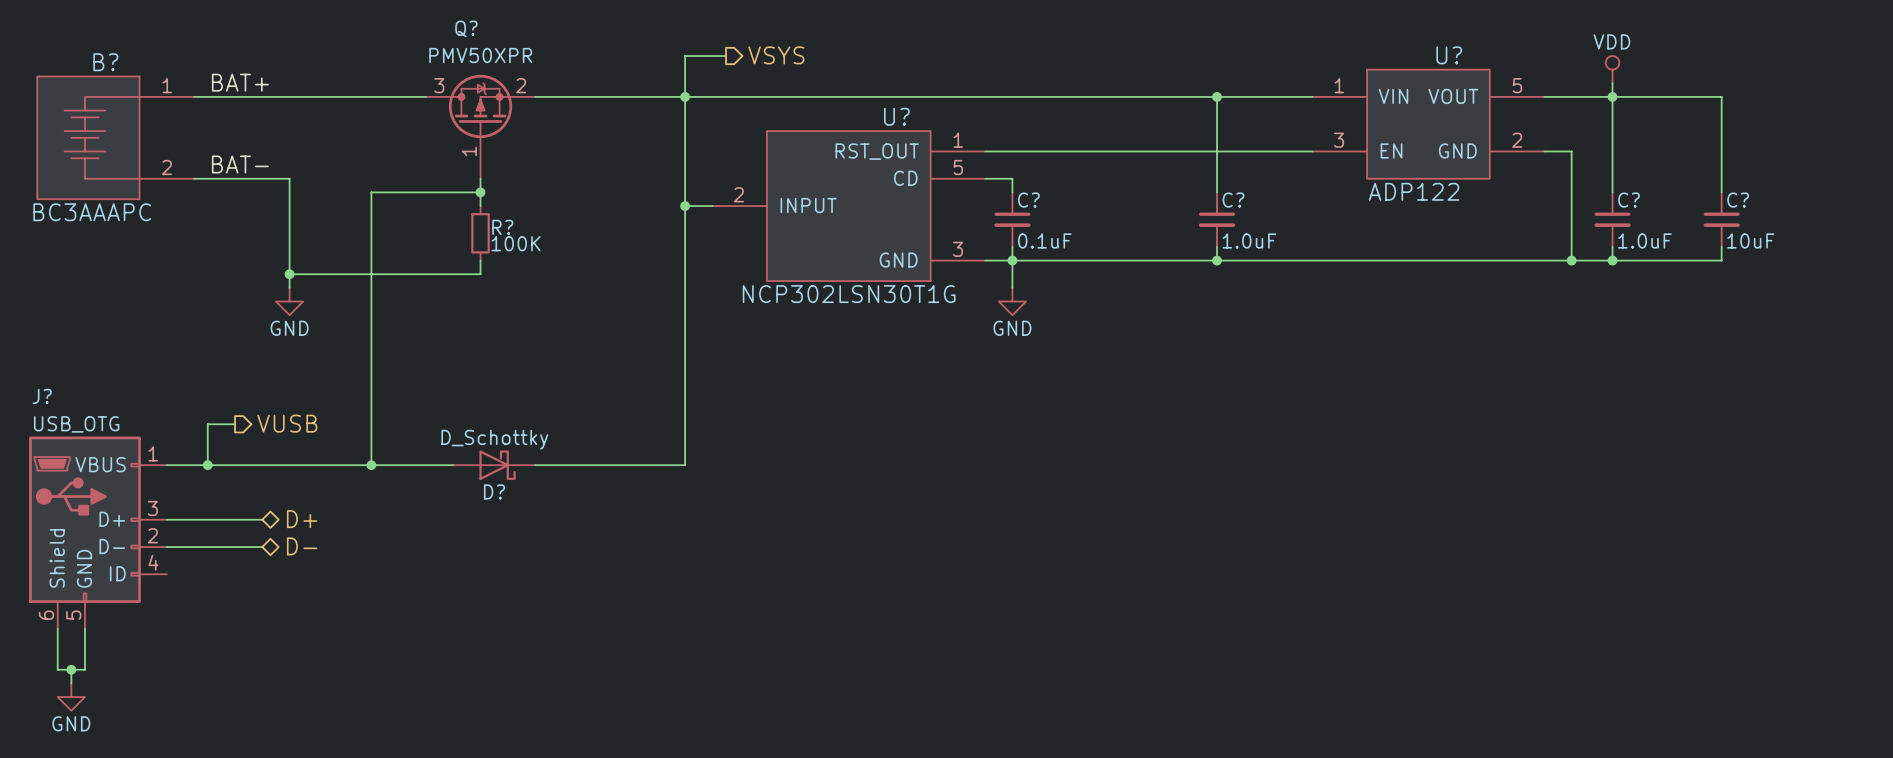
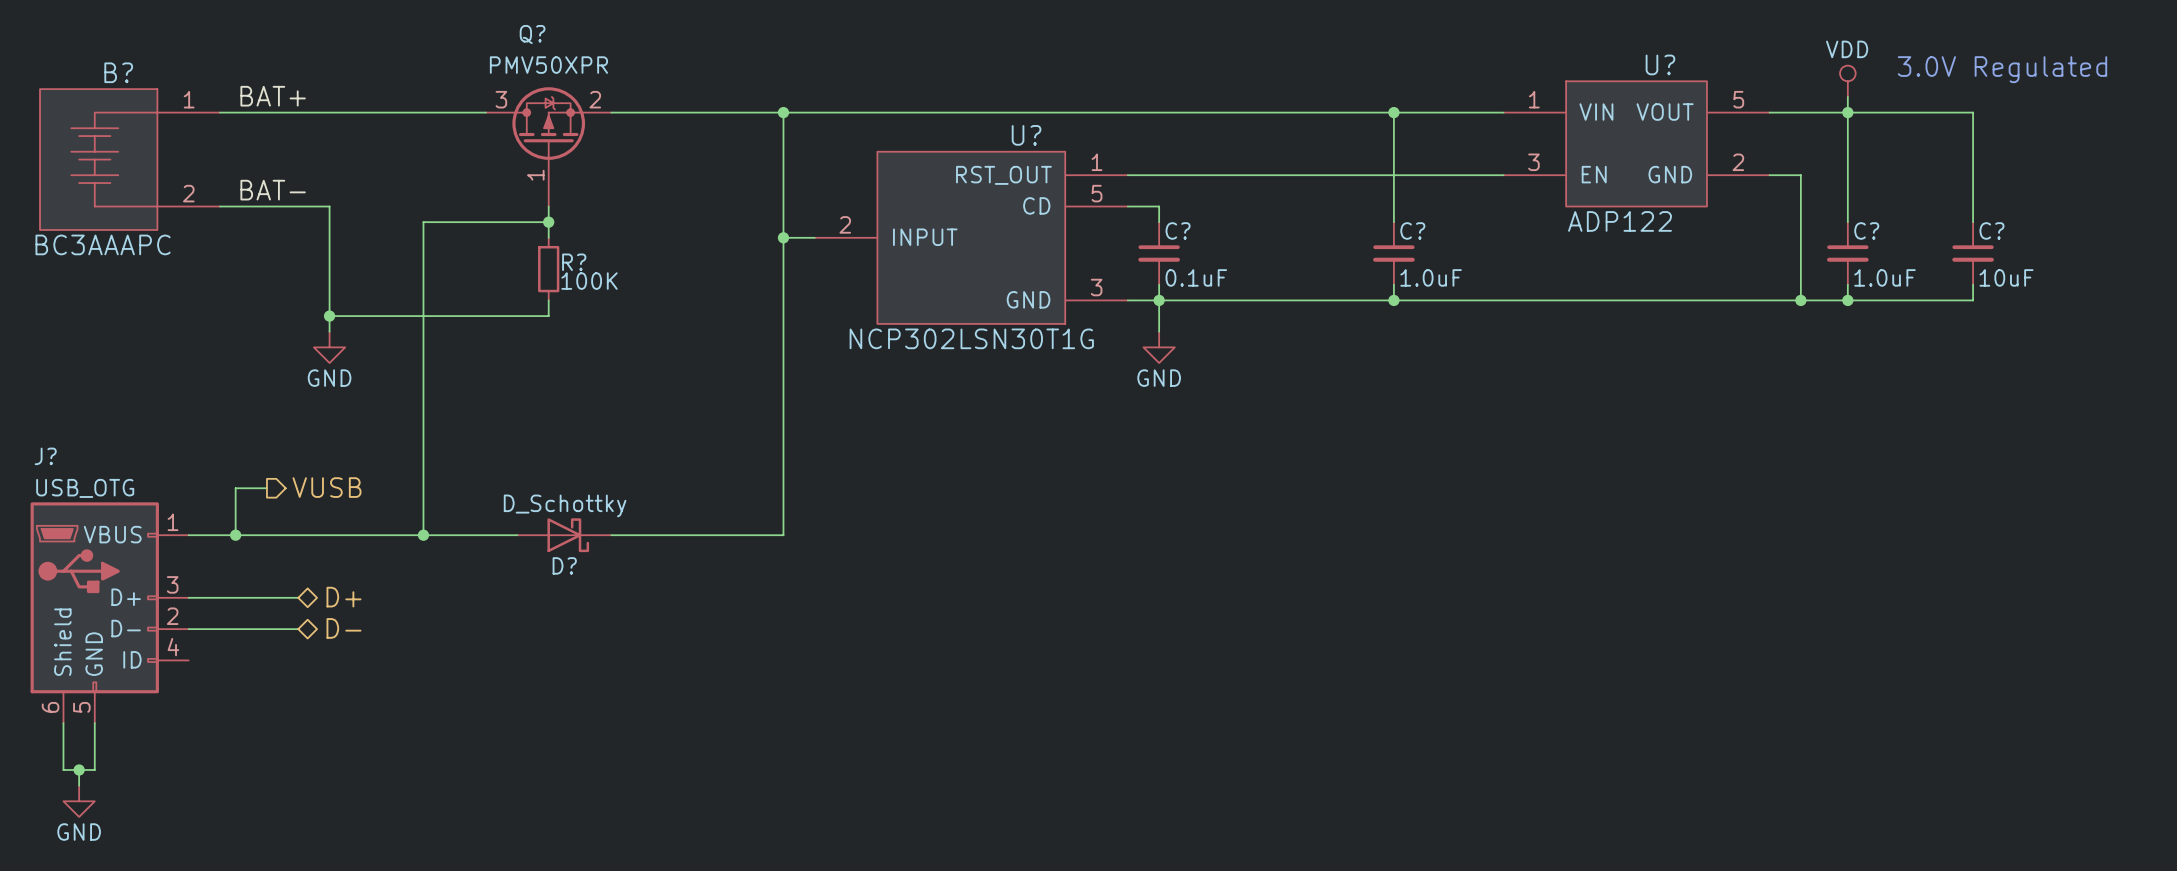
hierarchical label: VSYS (776, 55) -> none
wire: (726, 56) (685, 56) (685, 96) -> none
text: none -> 3.0V Regulated (2002, 69)

